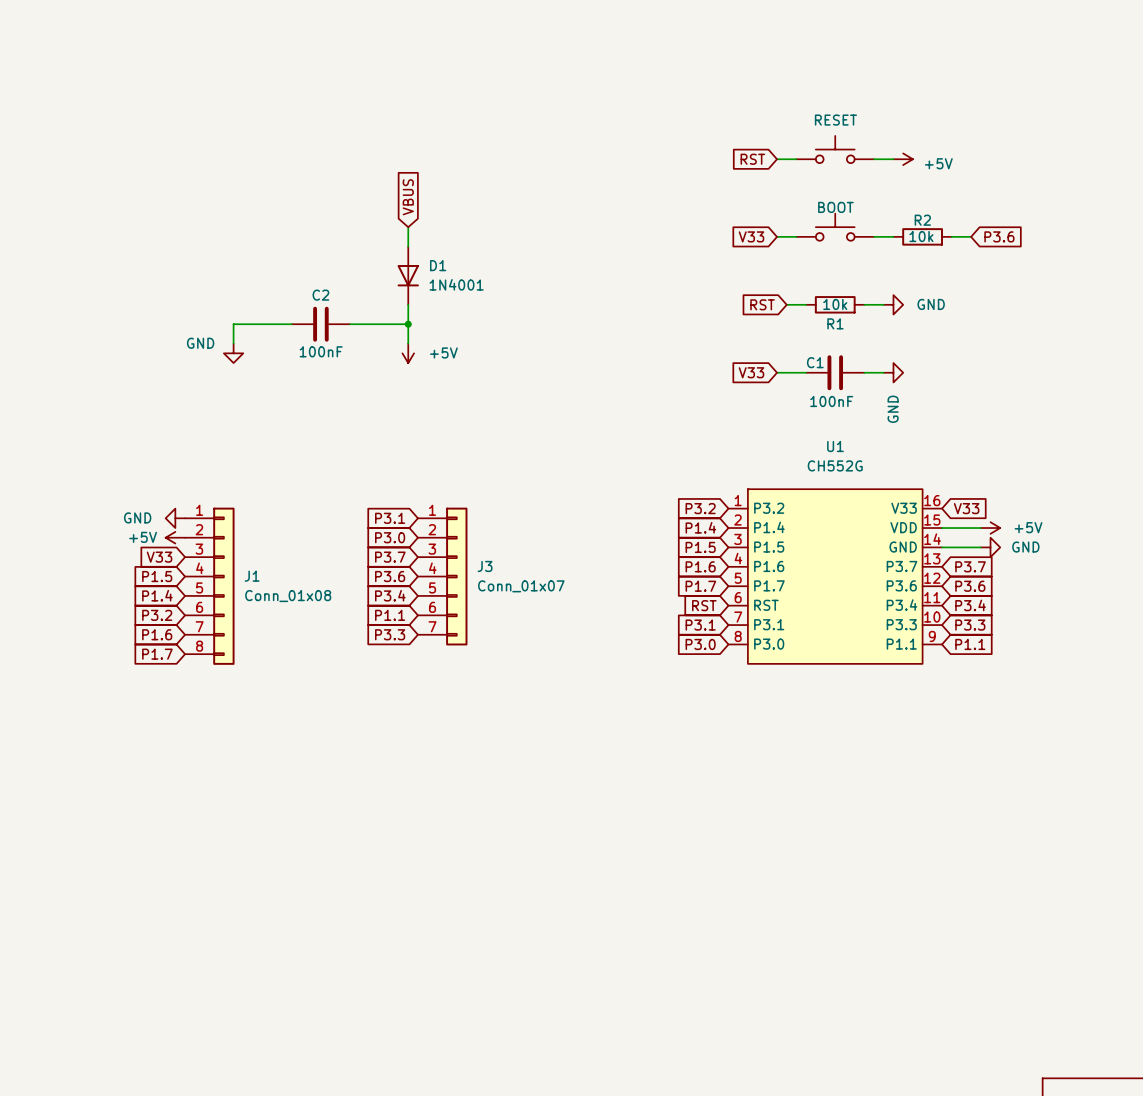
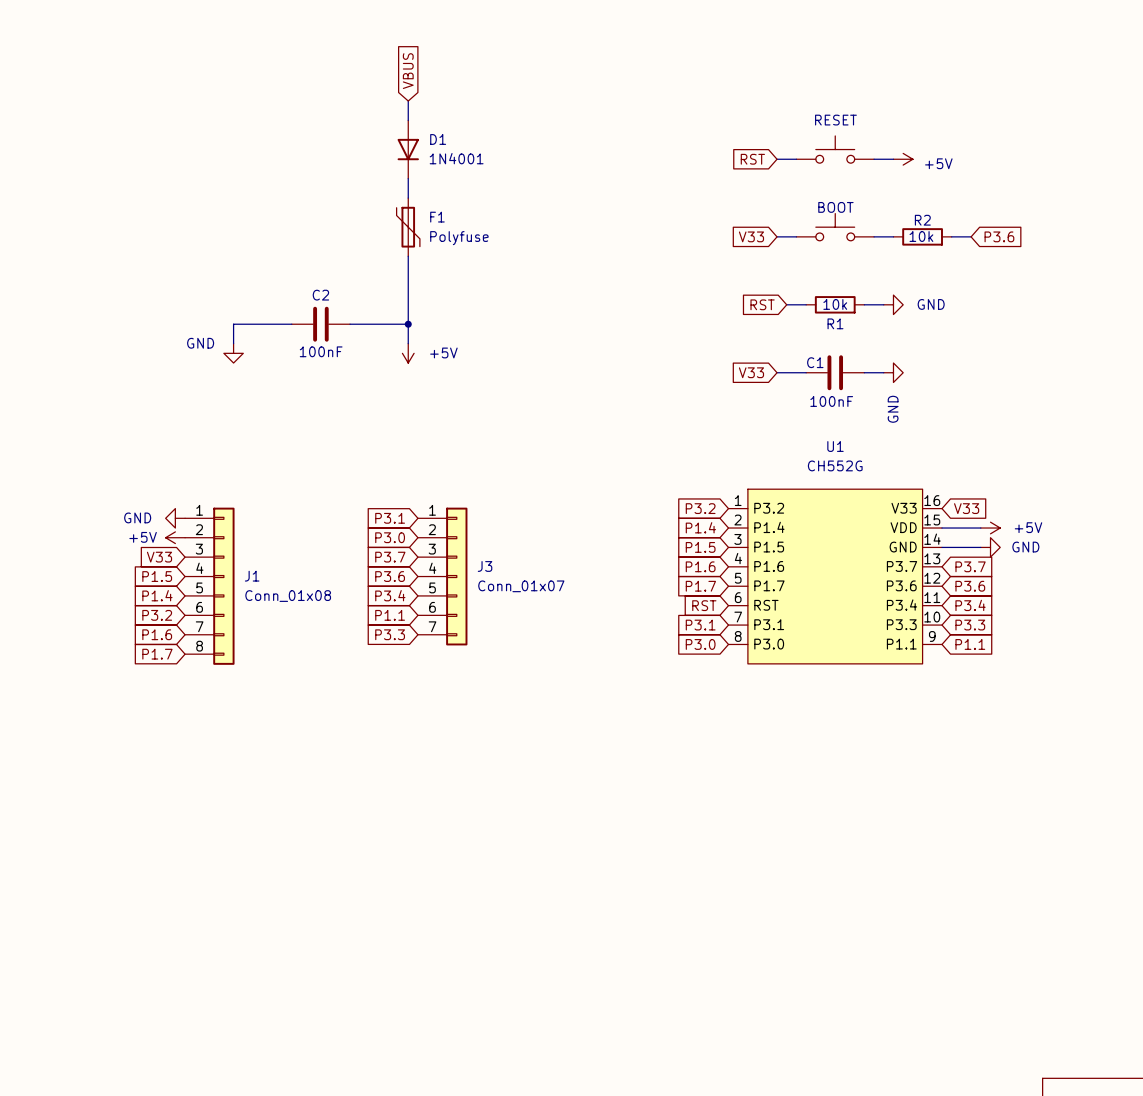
wire: none -> (408, 101) (408, 120)
global label position: VBUS (408, 197) -> VBUS (408, 71)
F1: none -> Polyfuse (408, 227)
D1 position: (408, 275) -> (408, 149)

